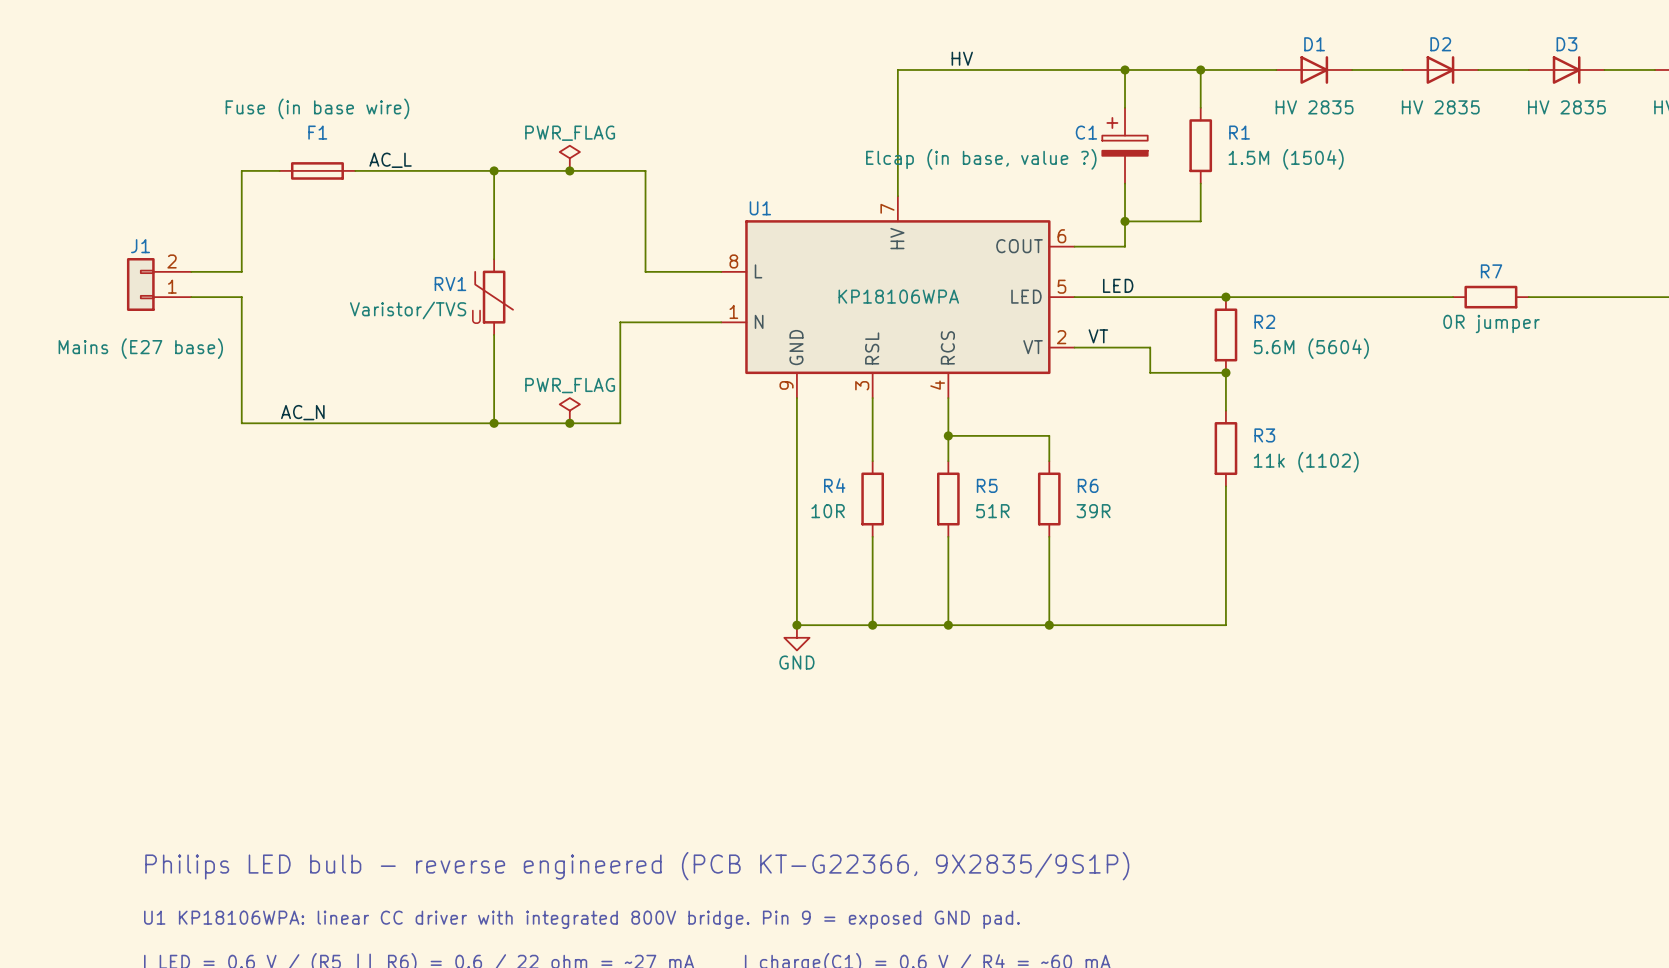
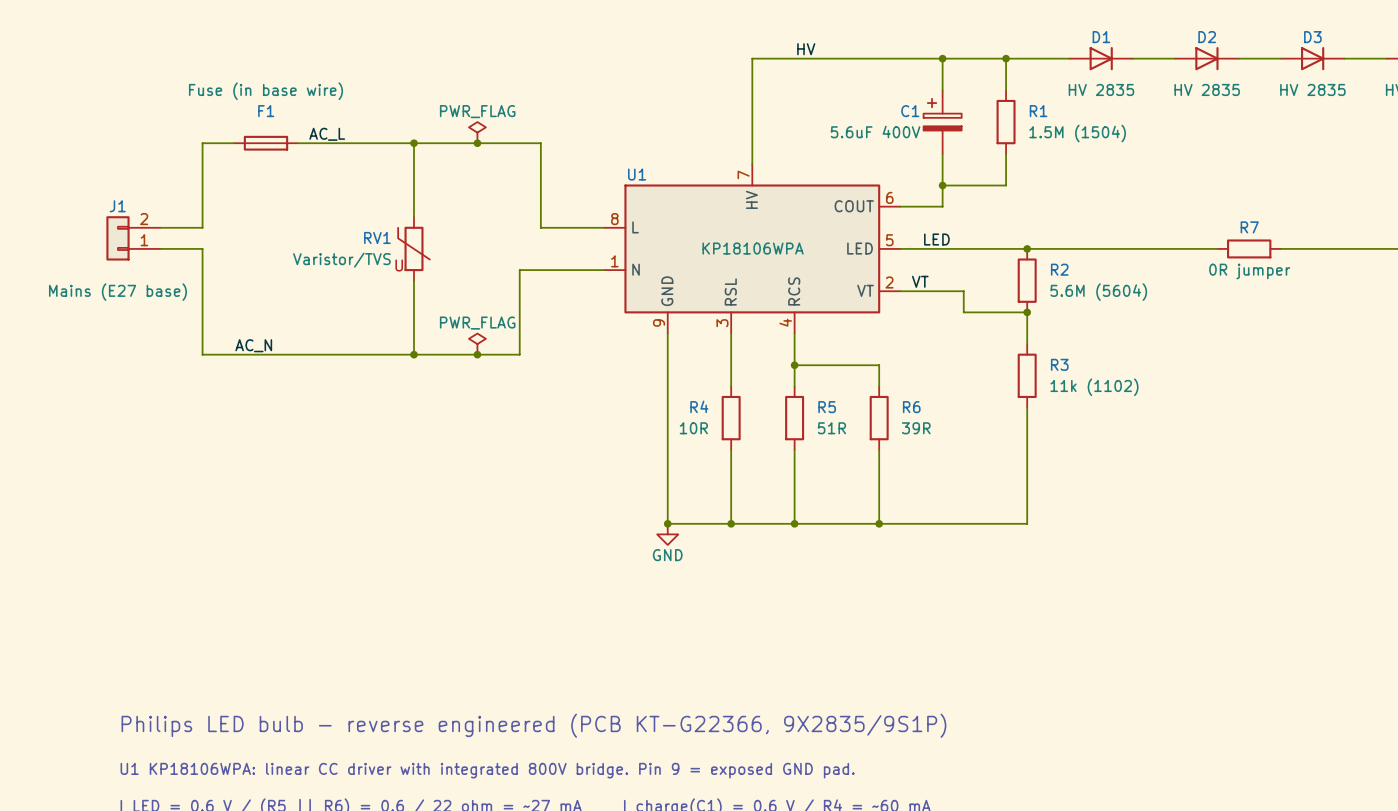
C1 value: Elcap (in base, value ?) (981, 159) -> 5.6uF 400V (875, 132)

